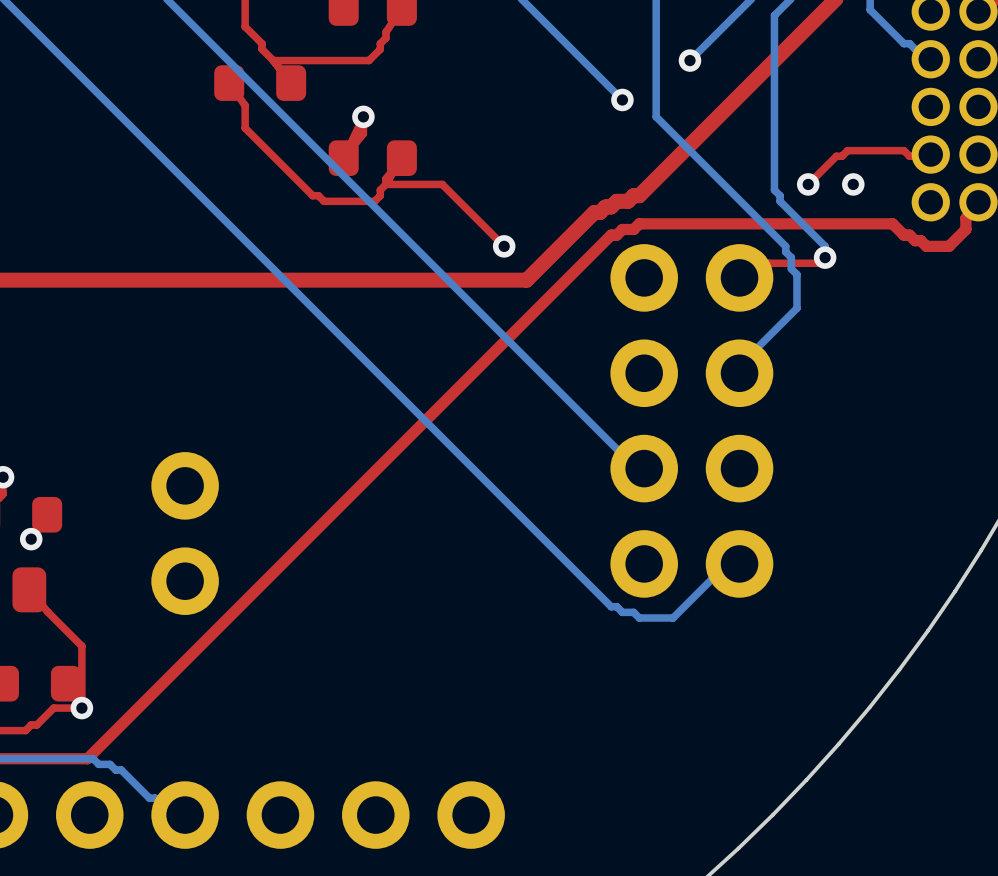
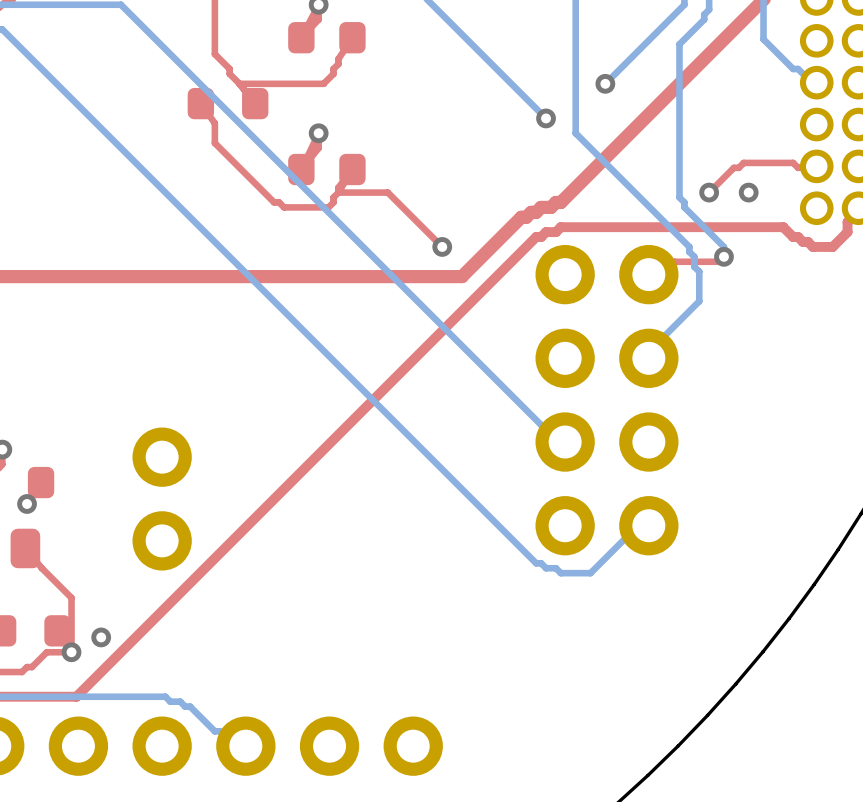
via: none -> (101, 637)
bottom track: (93, 758) (98, 764) (110, 764) (115, 770) (121, 770) (149, 798) (155, 798) (185, 815) -> (81, 696) (165, 696) (170, 701) (180, 701) (185, 706) (190, 706) (214, 731) (219, 731) (245, 746)

